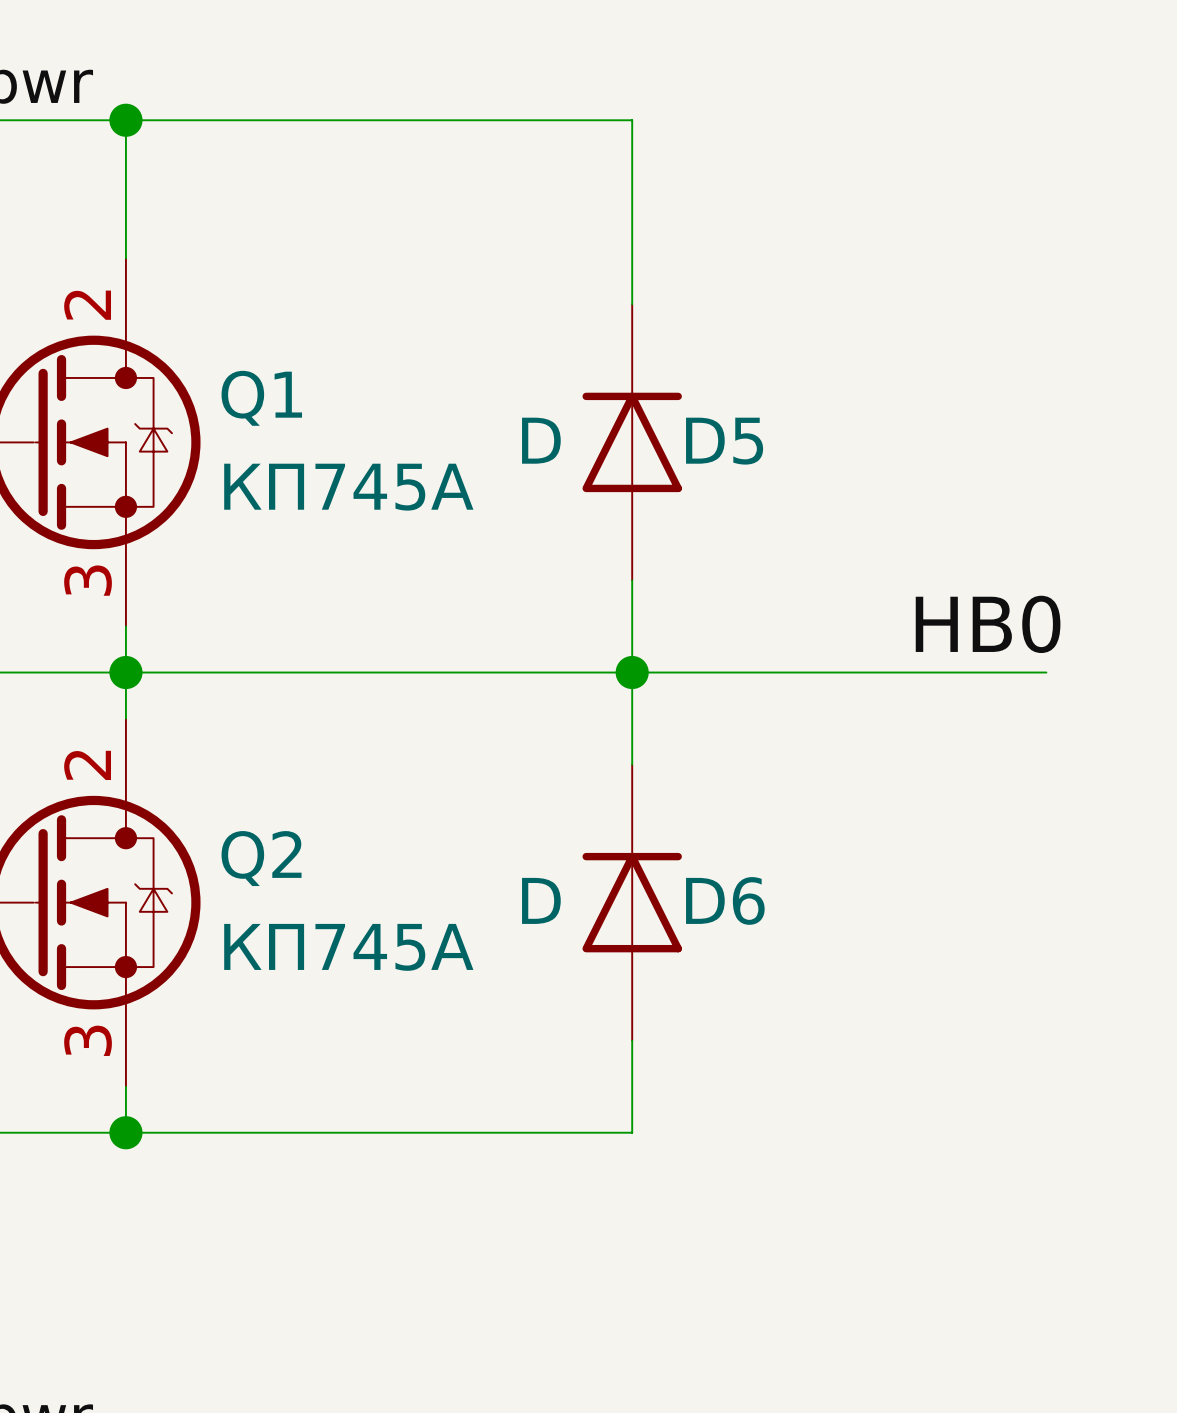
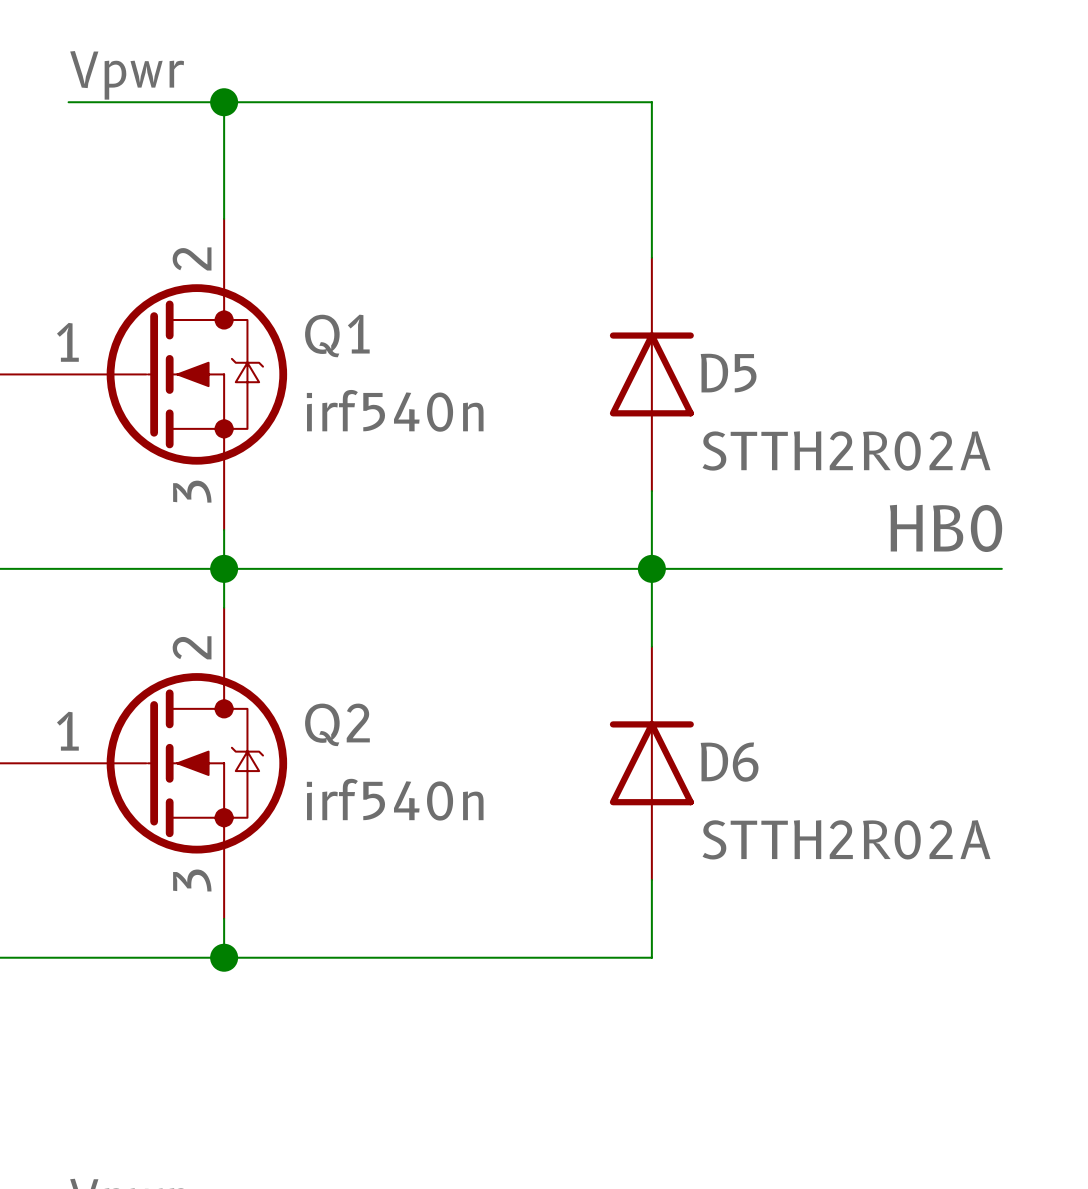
D5 value: D (541, 440) -> STTH2R02A (846, 450)
Q1 value: КП745А (348, 487) -> irf540n (395, 410)
D6 value: D (541, 900) -> STTH2R02A (846, 839)
Q2 value: КП745А (348, 947) -> irf540n (395, 799)

